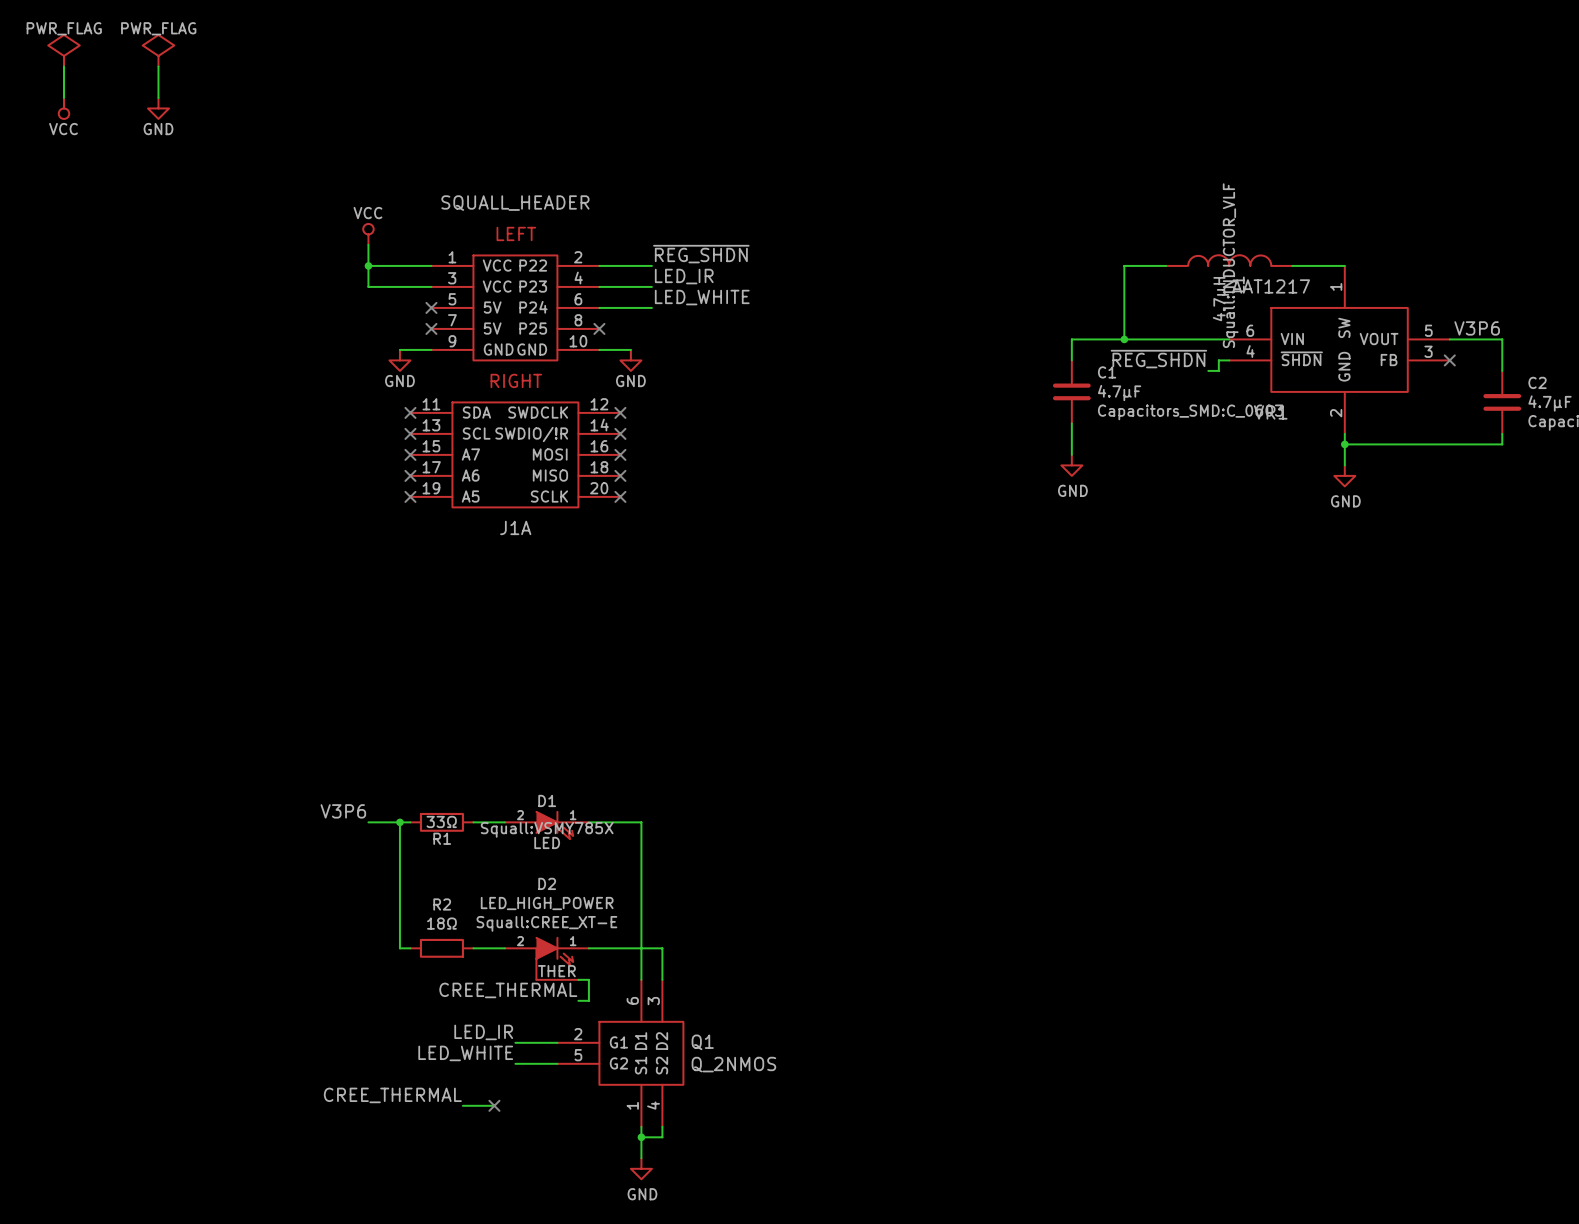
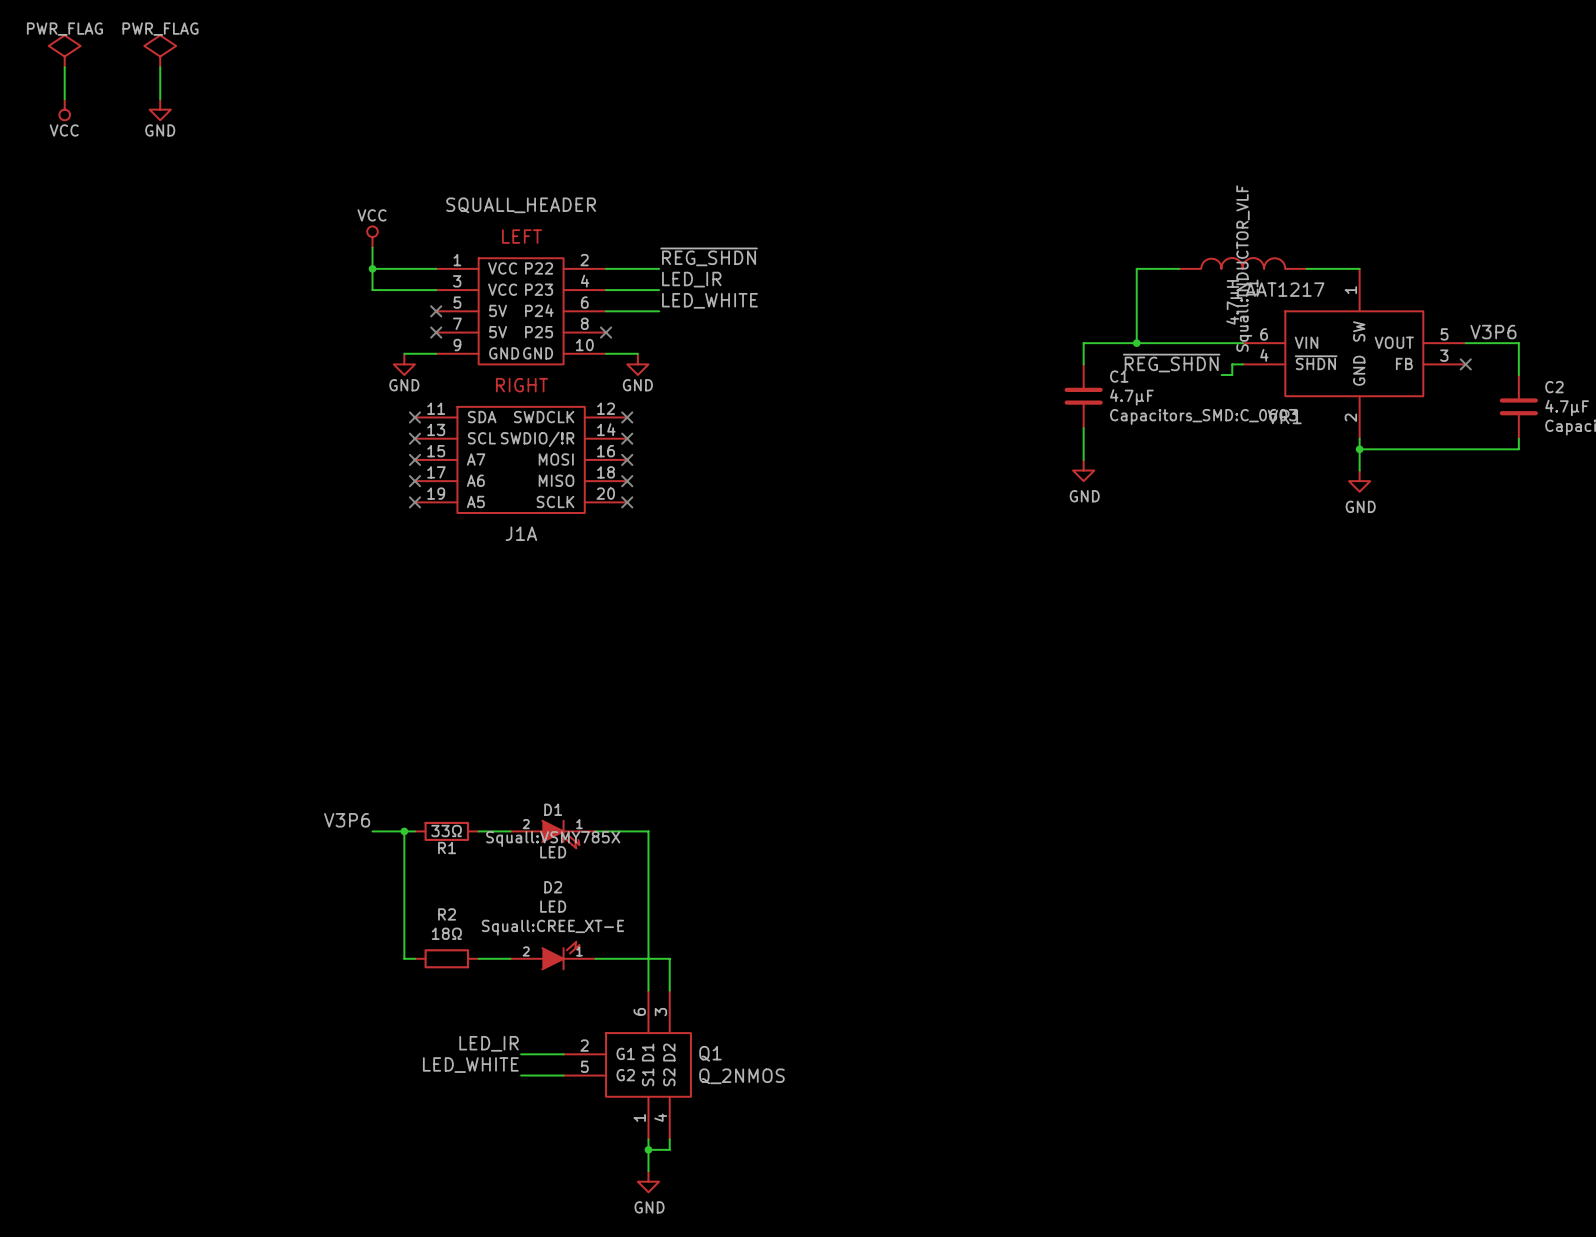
D2 value: LED_HIGH_POWER (547, 903) -> LED (553, 906)
D2 symbol: [504, 937, 589, 980] -> [510, 941, 596, 970]
wire: (578, 979) (588, 979) (588, 1000) (578, 1000) -> none
label: CREE_THERMAL (508, 990) -> none
label: CREE_THERMAL (392, 1095) -> none
wire: (462, 1105) (494, 1105) -> none
no-connect mark: (494, 1105) -> none

